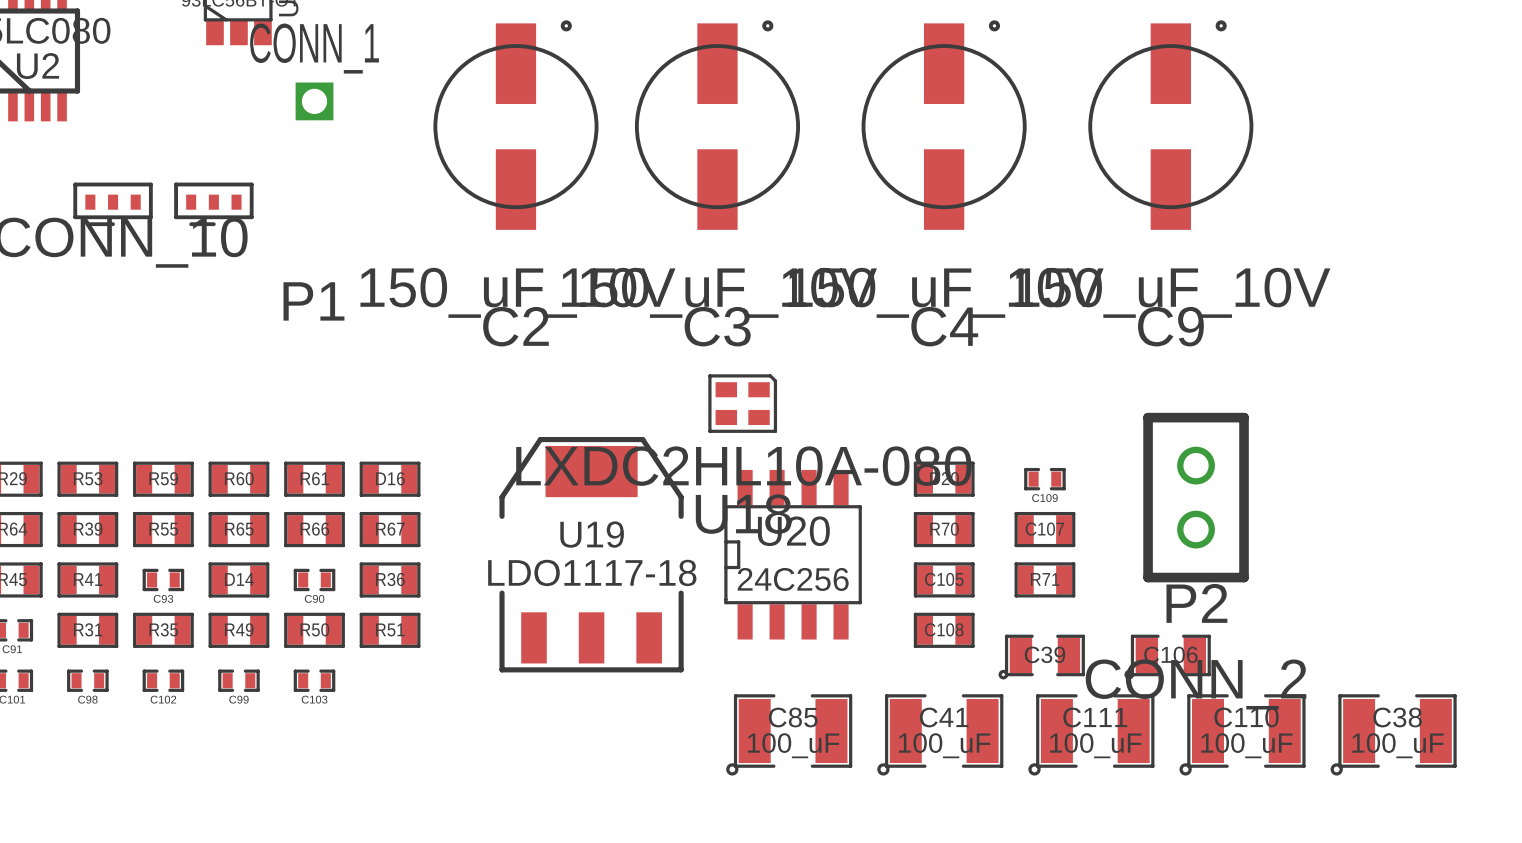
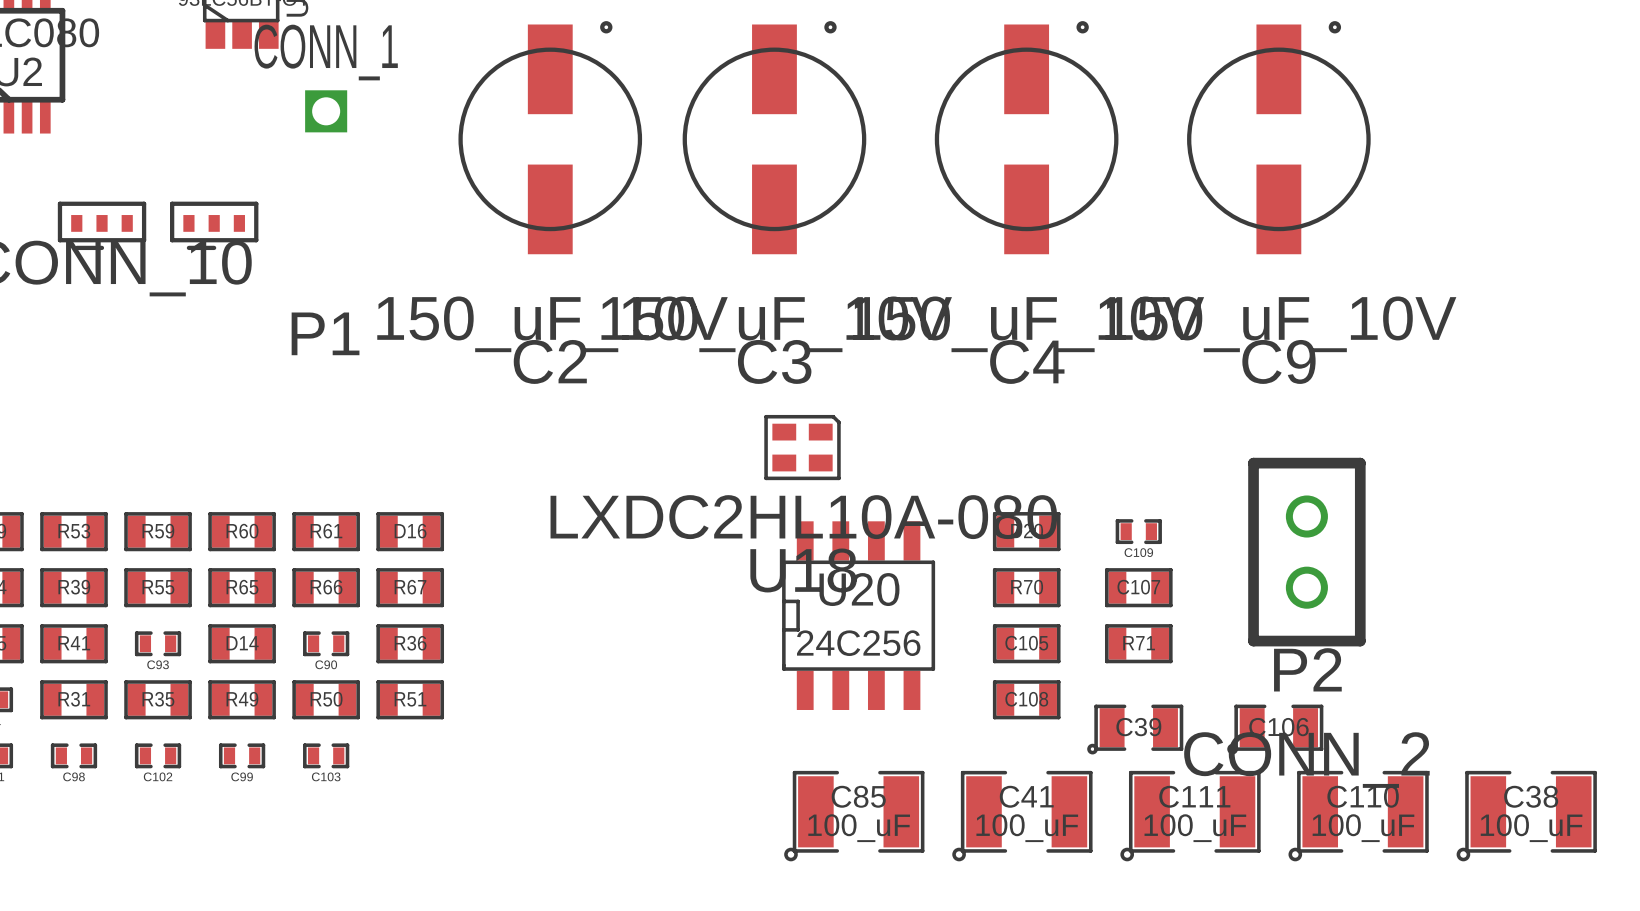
U19: LDO1117-18 (591, 554) -> none

